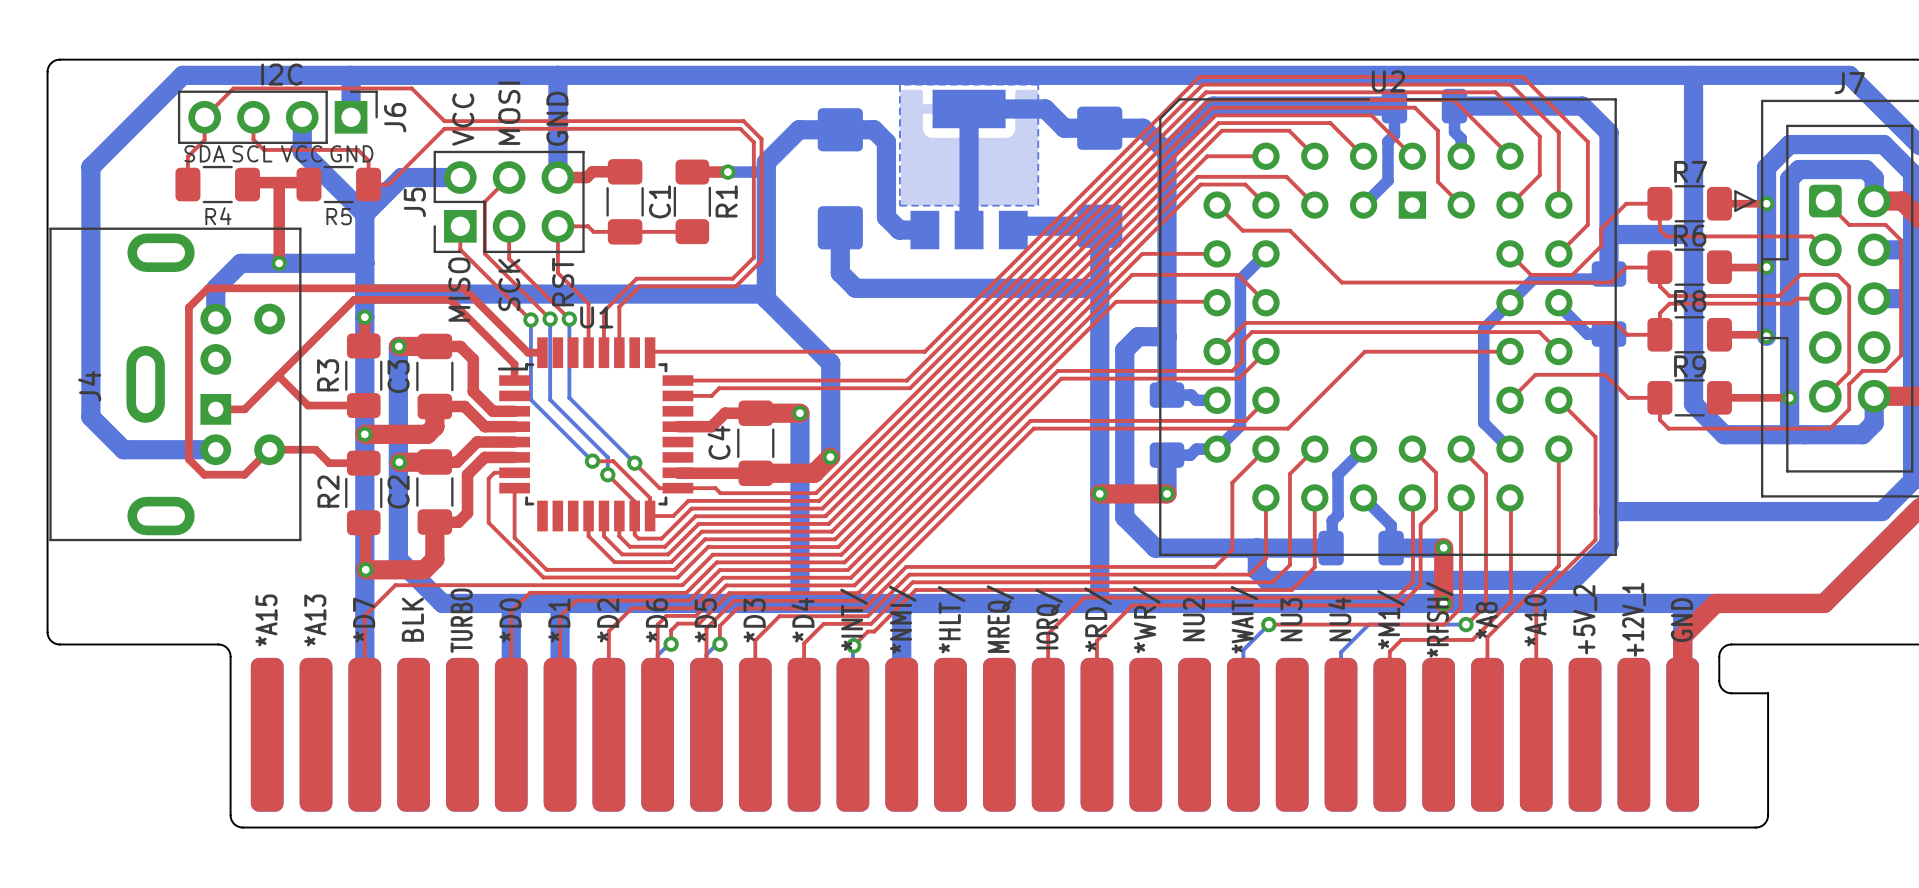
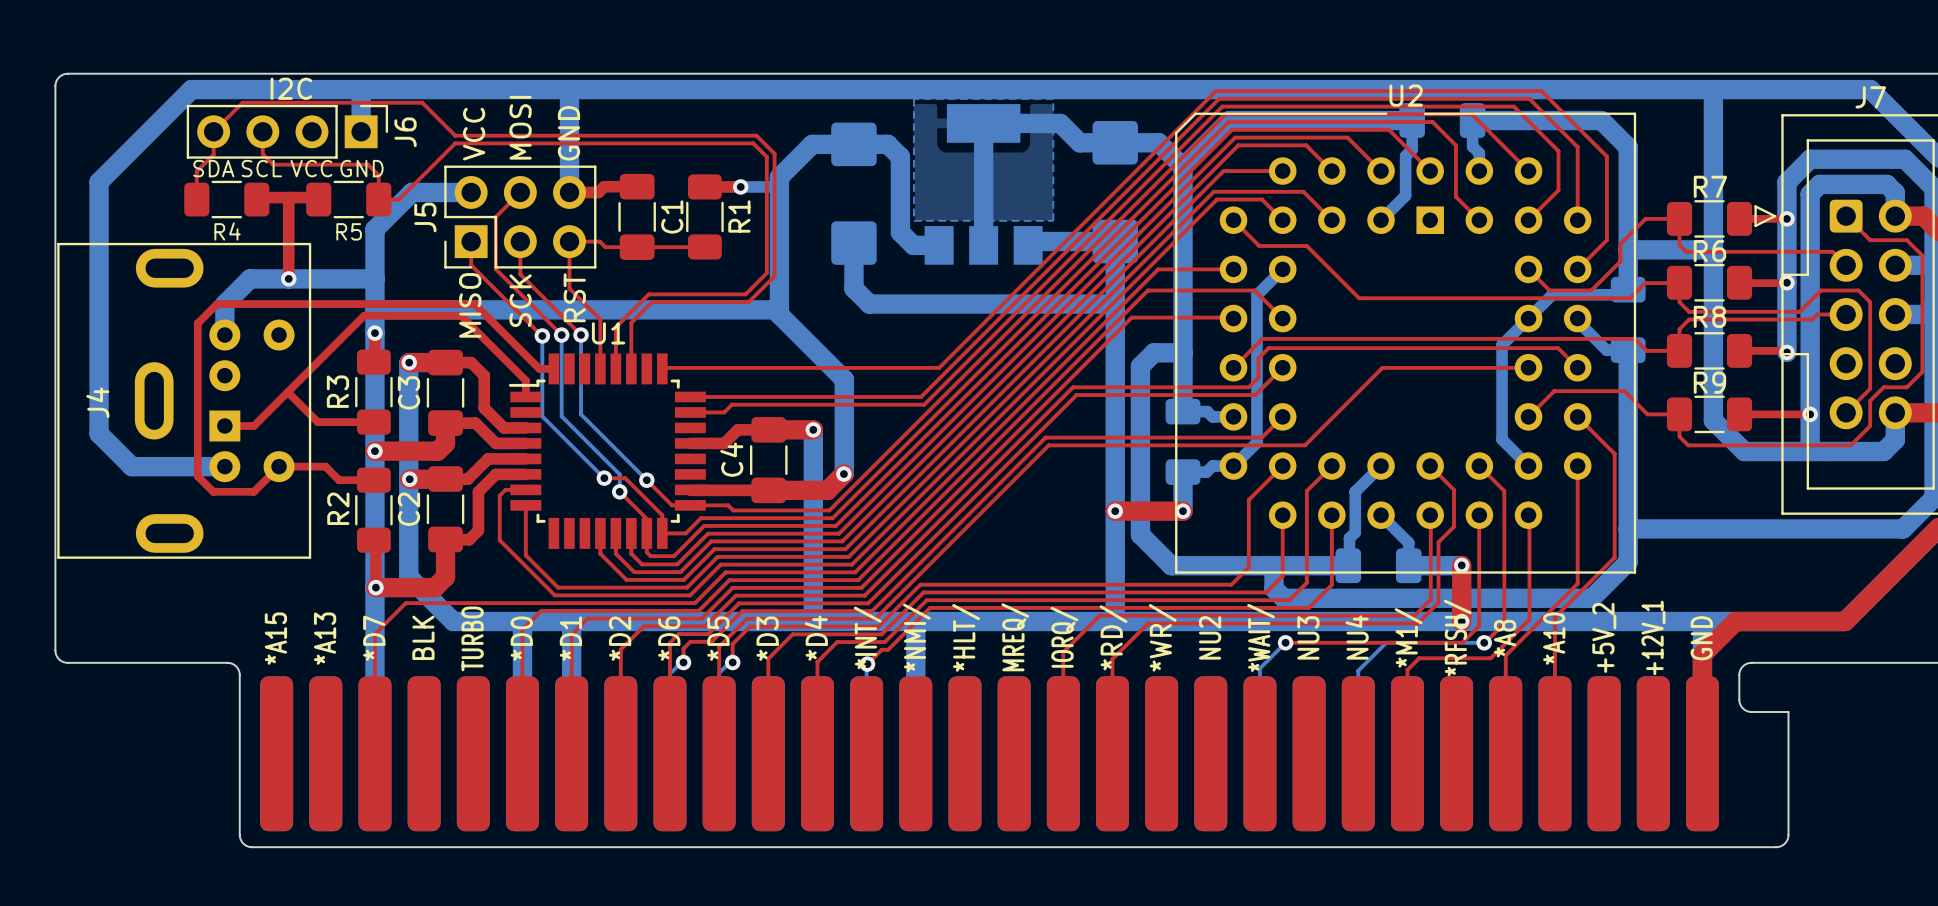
bottom track: (302, 117) (302, 151) (364, 214) -> none

